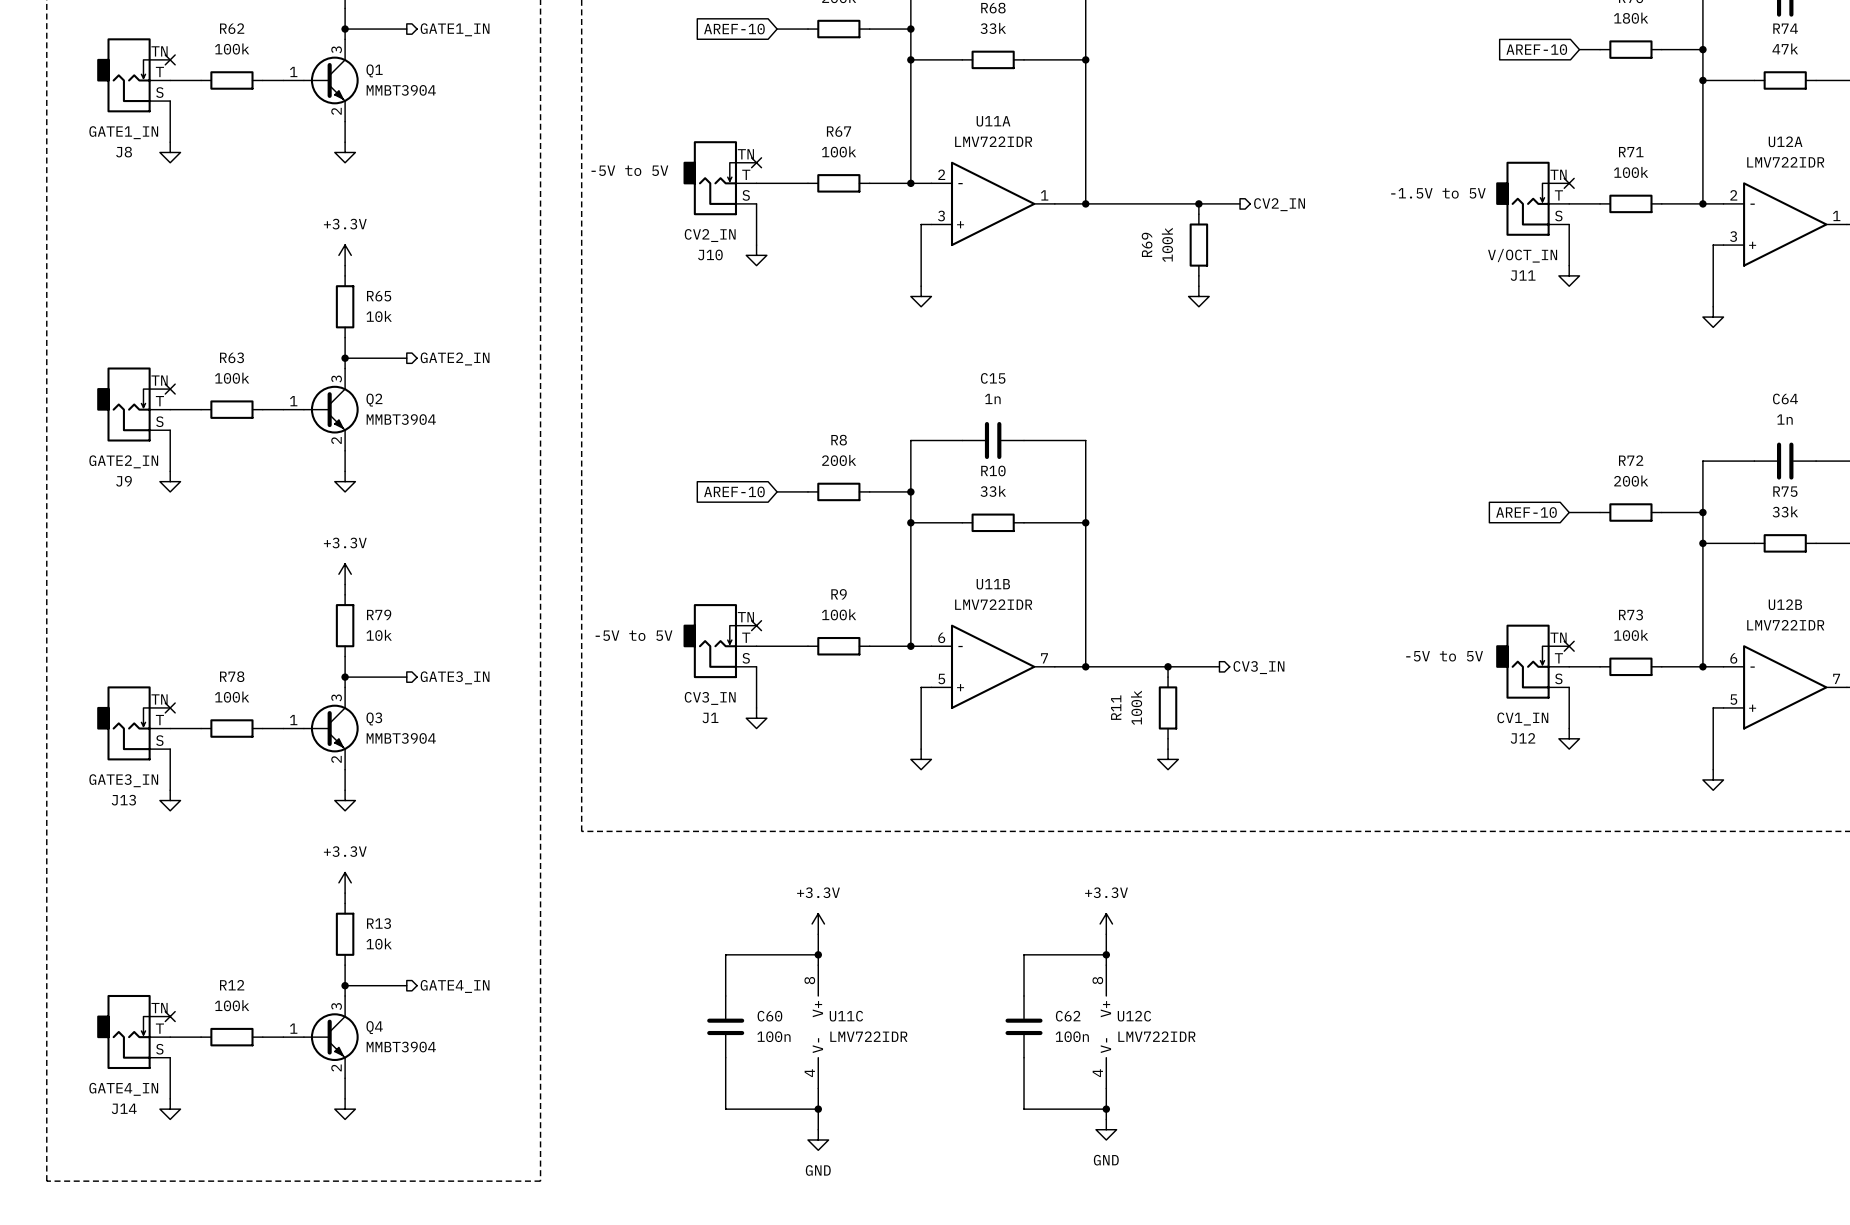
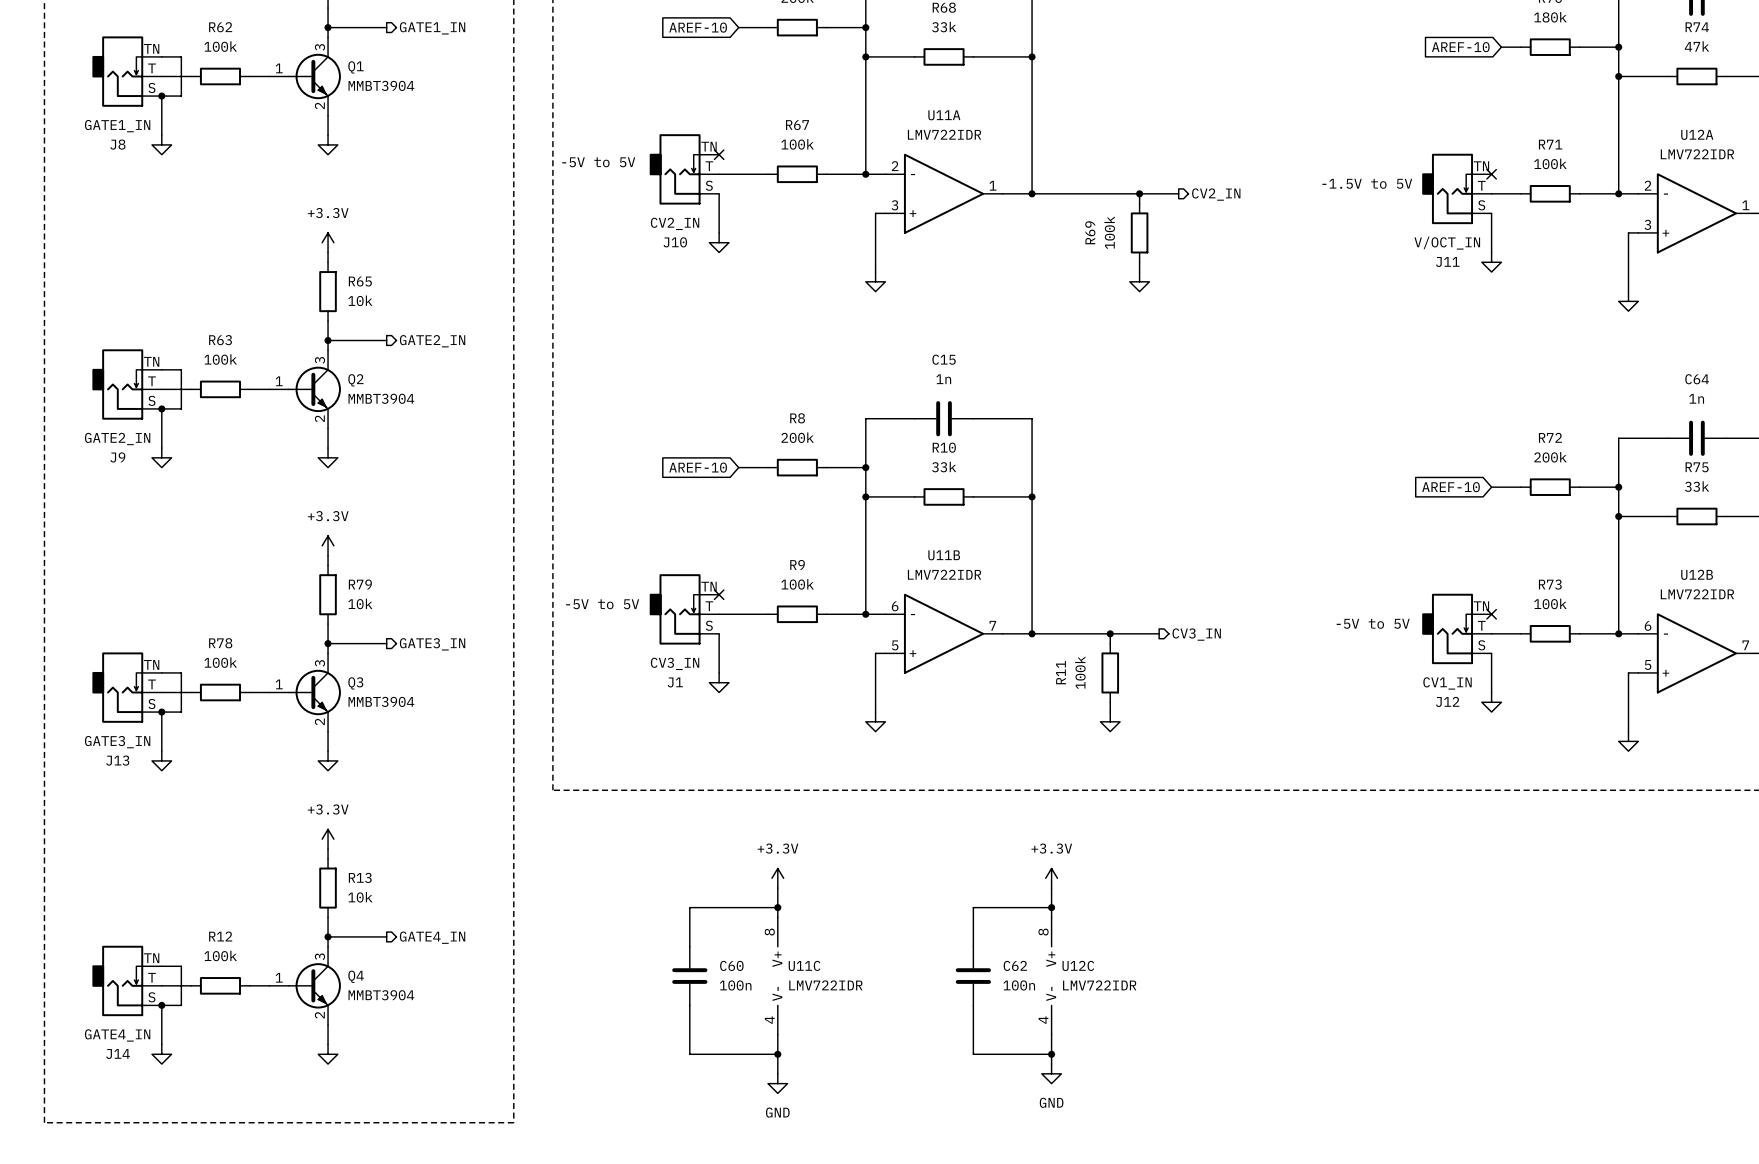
wire: none -> (161, 56) (181, 56) (181, 96) (161, 96)
no-connect mark: (170, 59) -> none
junction: none -> (161, 96)
wire: none -> (161, 369) (181, 369) (181, 408) (161, 408)
no-connect mark: (170, 389) -> none
junction: none -> (161, 408)
wire: none -> (161, 672) (181, 672) (181, 712) (161, 712)
no-connect mark: (170, 707) -> none
junction: none -> (161, 712)
wire: none -> (161, 966) (181, 966) (181, 1005) (161, 1005)
no-connect mark: (170, 1016) -> none
junction: none -> (161, 1005)

